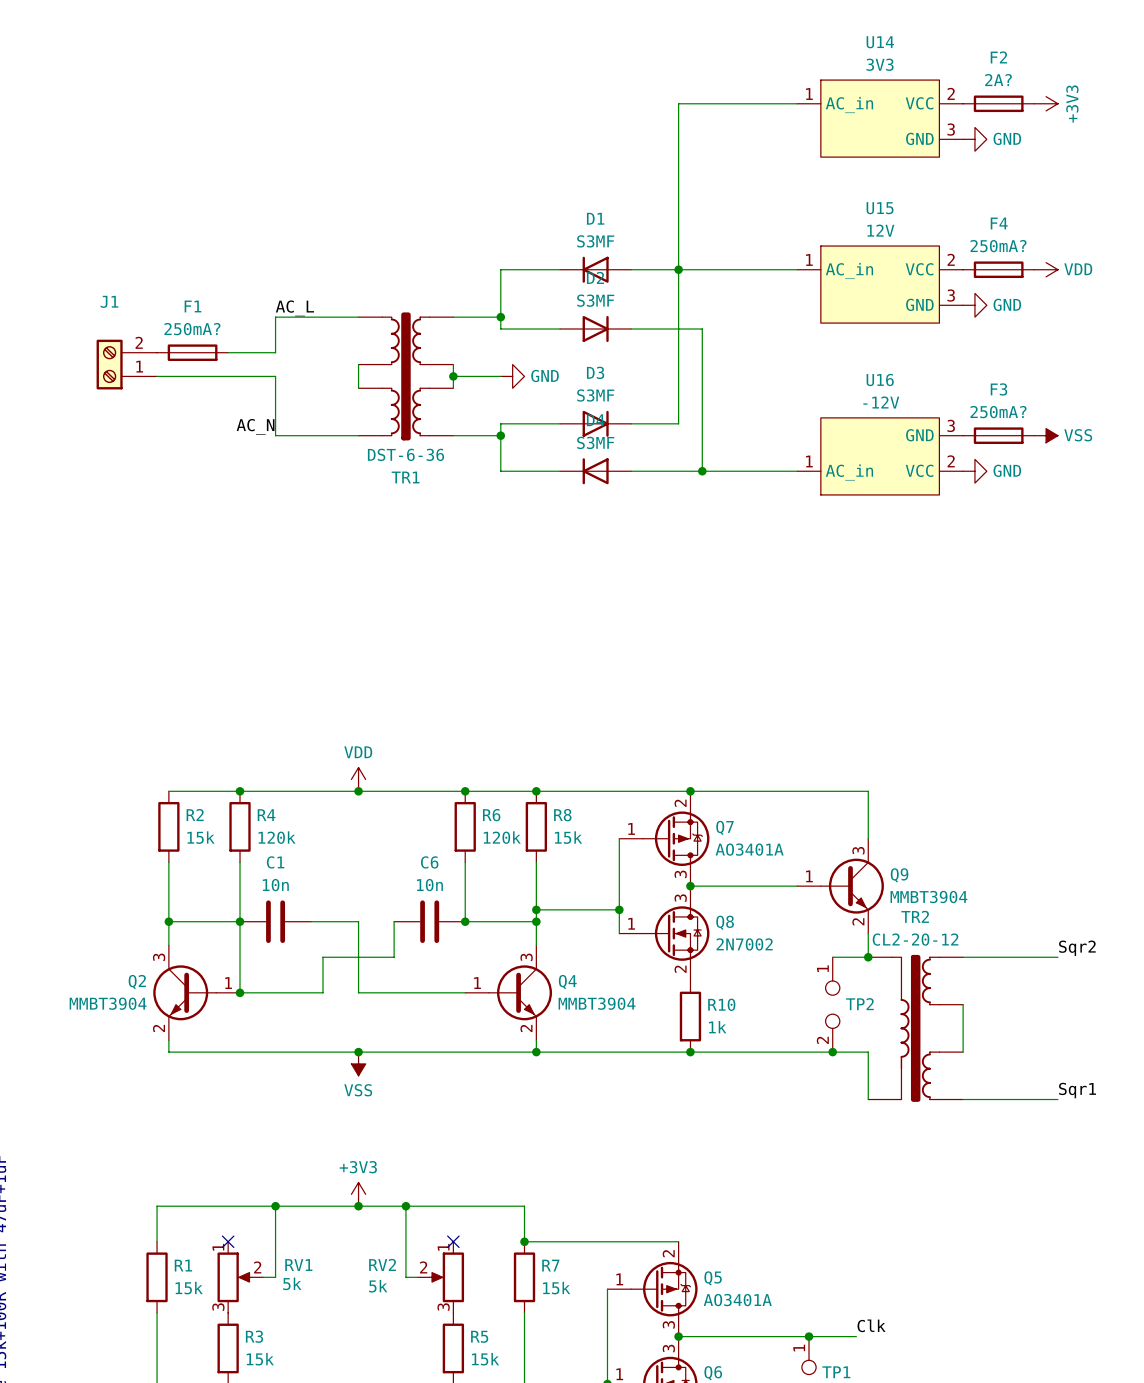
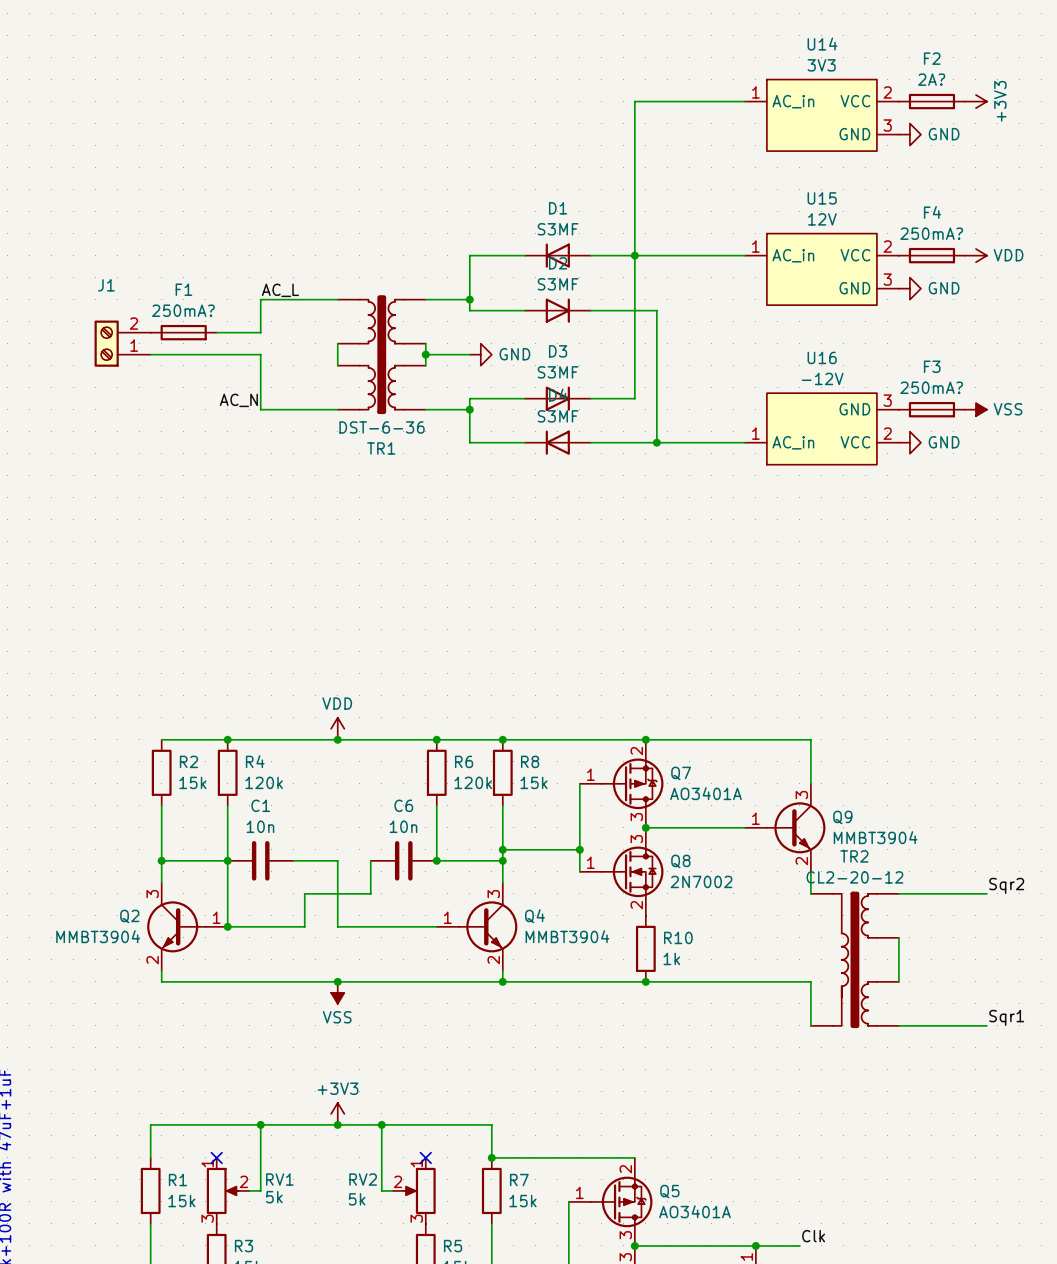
wire: (832, 957) (868, 957) -> none
junction: (868, 957) -> none
TP2: (832, 1004) -> none
junction: (832, 1052) -> none

